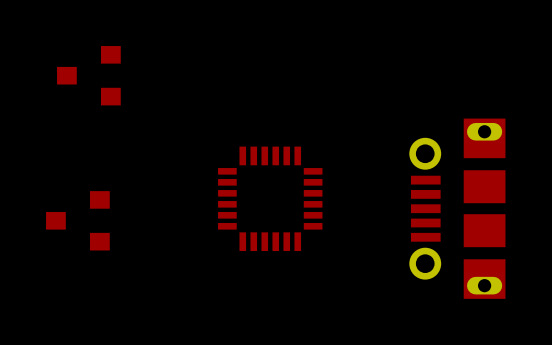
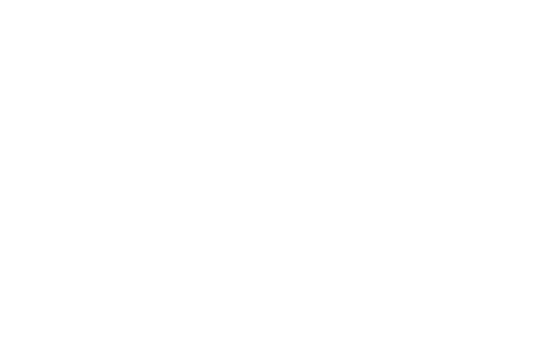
part: (88, 75) -> none
part: (270, 198) -> none
part: (457, 208) -> none
part: (77, 220) -> none

